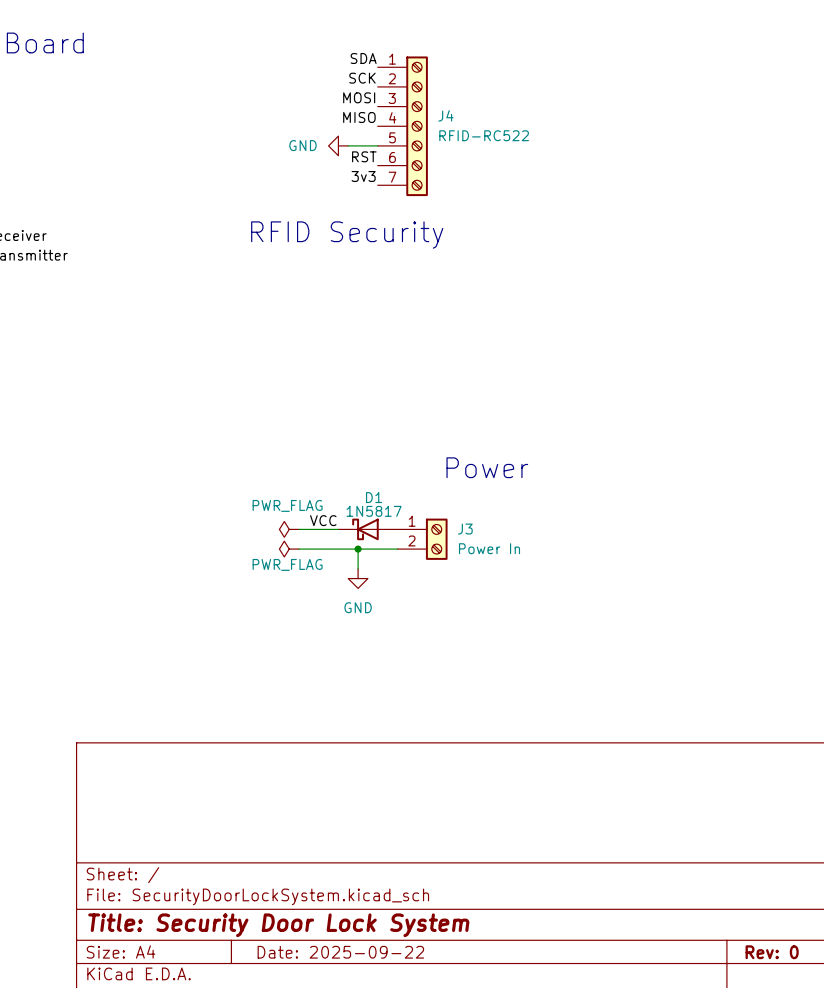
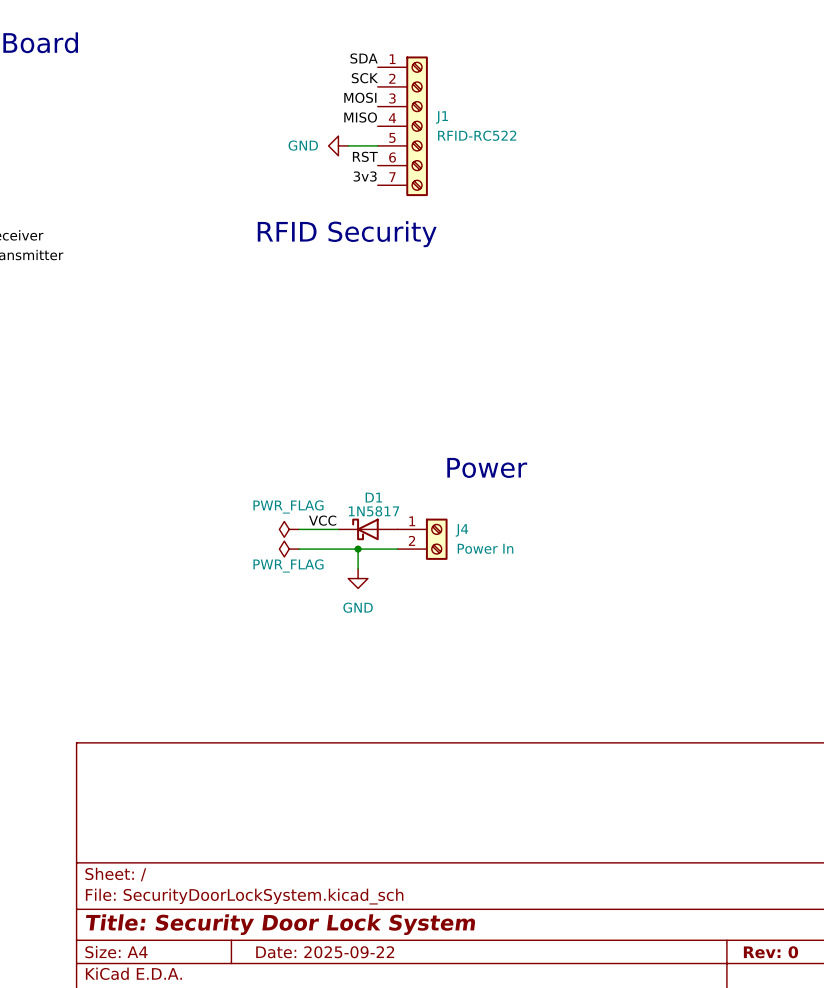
J4 name: J4 (445, 115) -> J1 (442, 117)
J3 name: J3 (465, 529) -> J4 (461, 530)

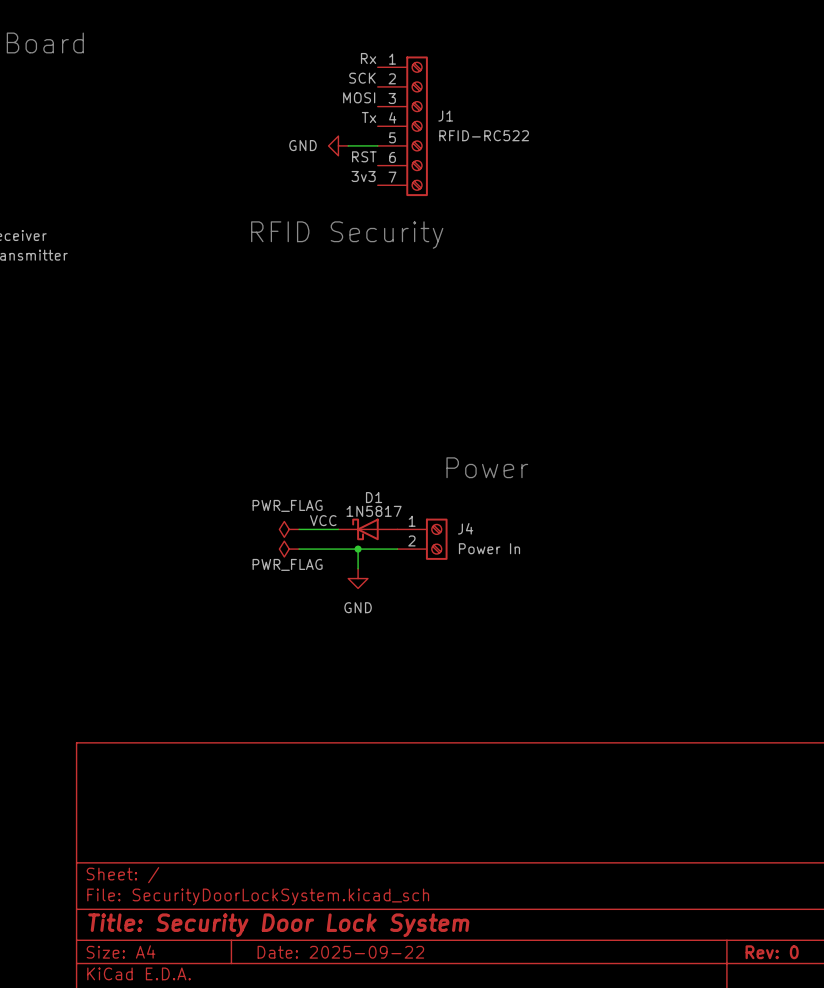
label: SDA (364, 58) -> Rx (368, 58)
label: MISO (360, 117) -> Tx (369, 117)

